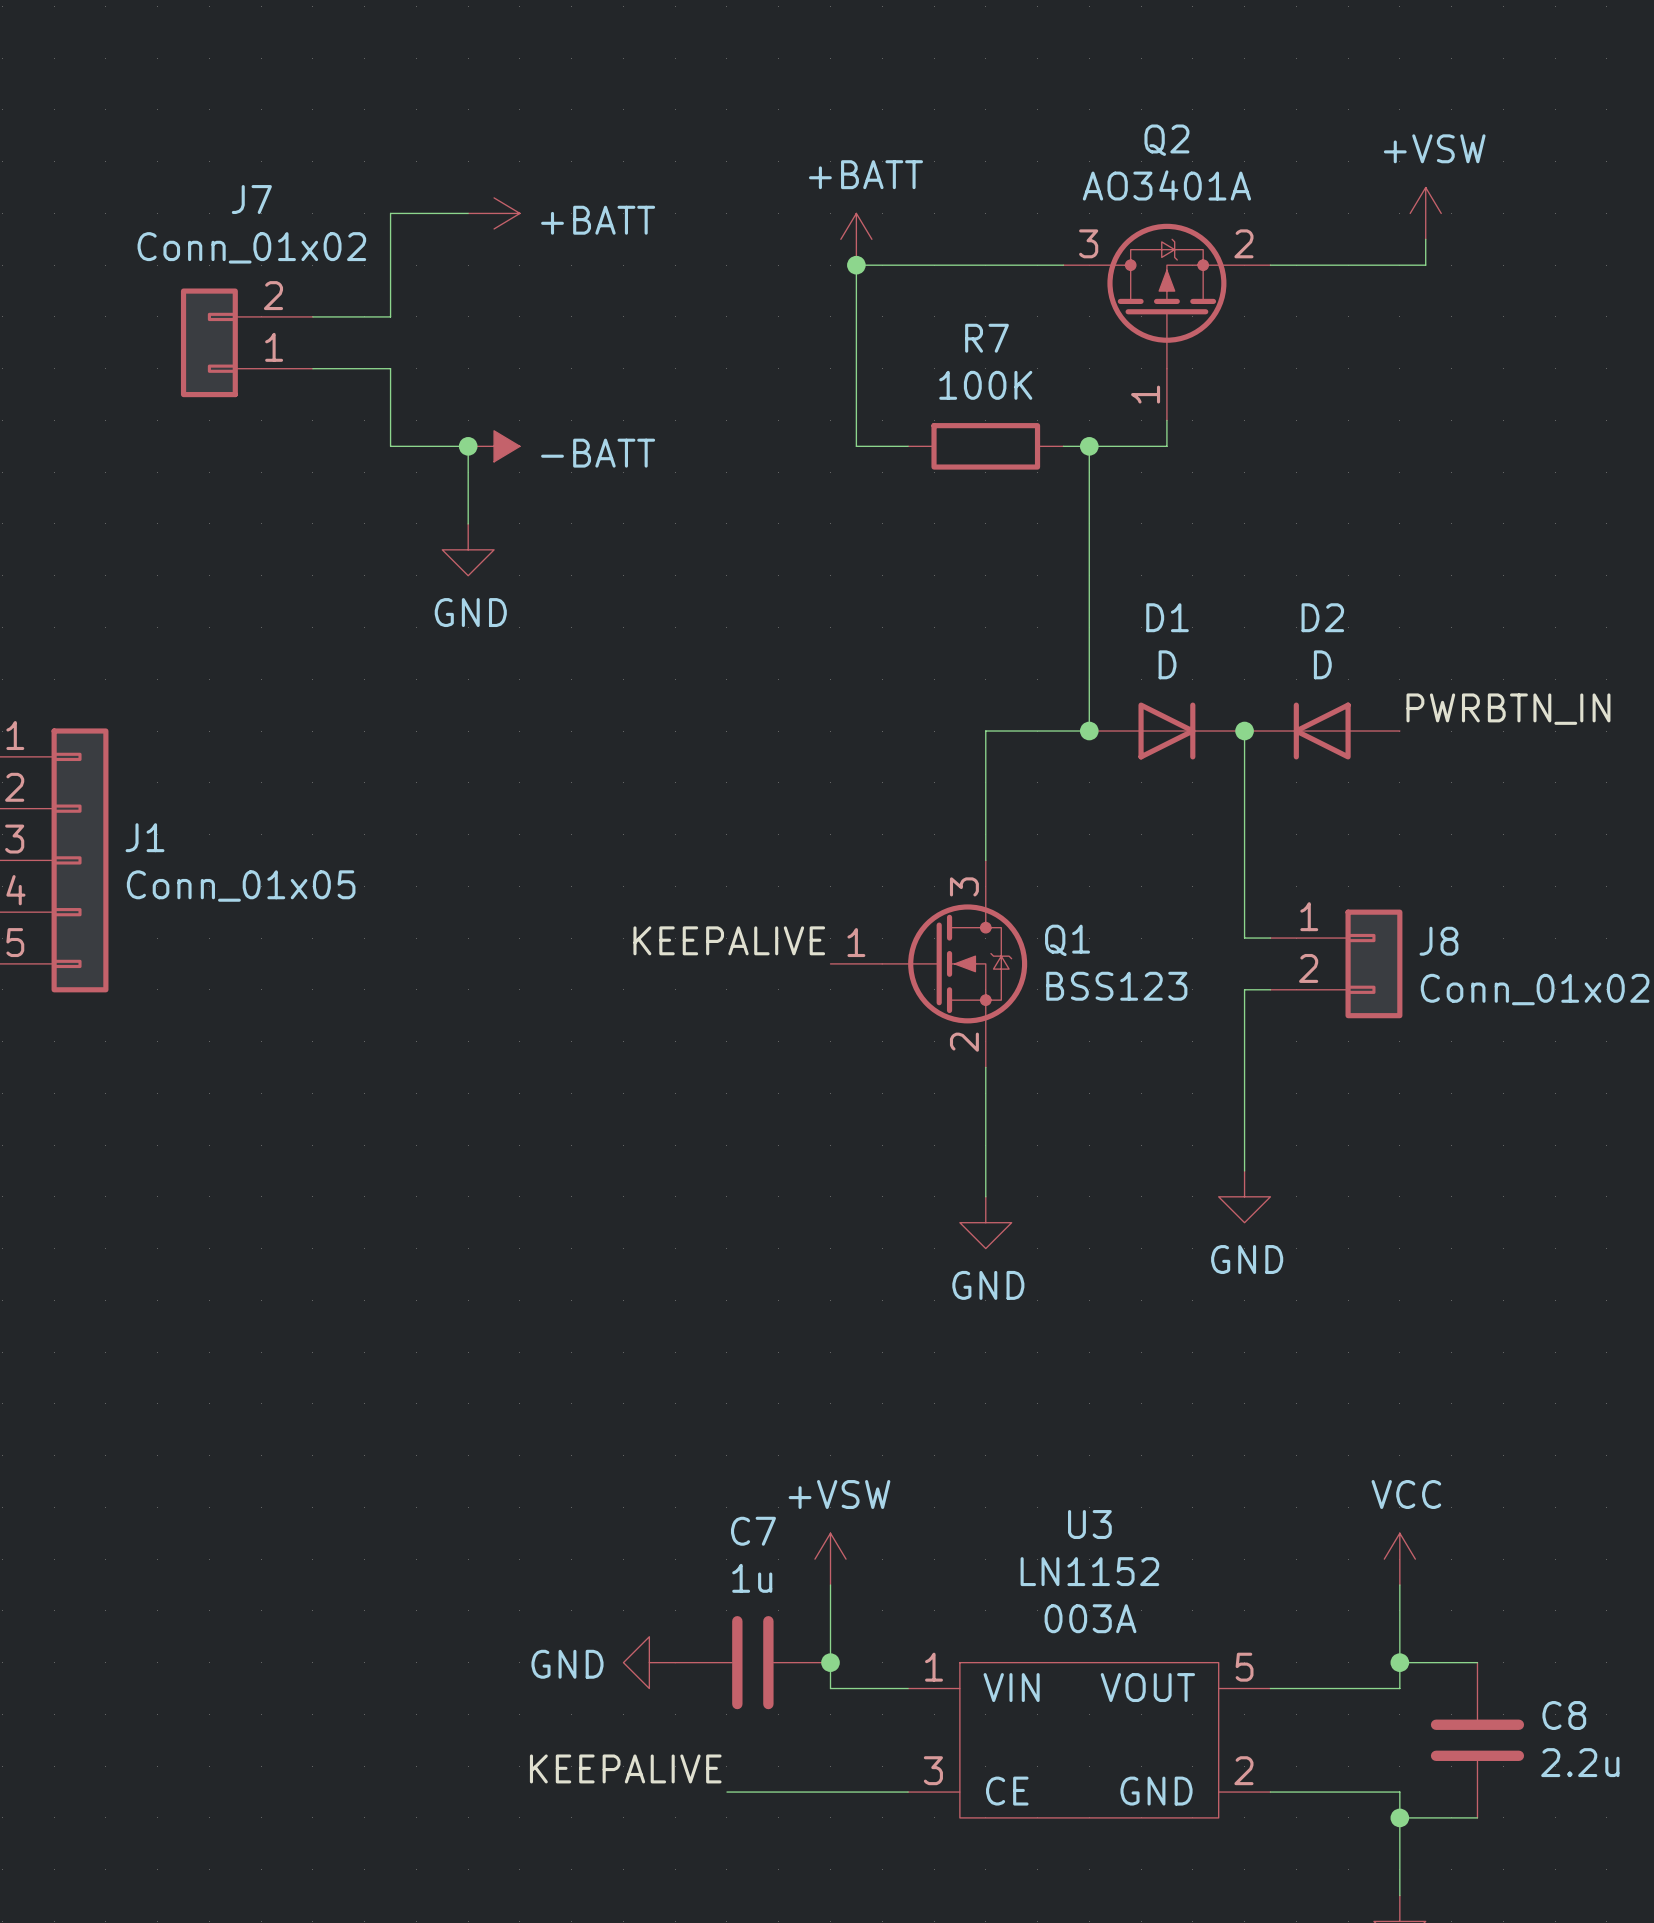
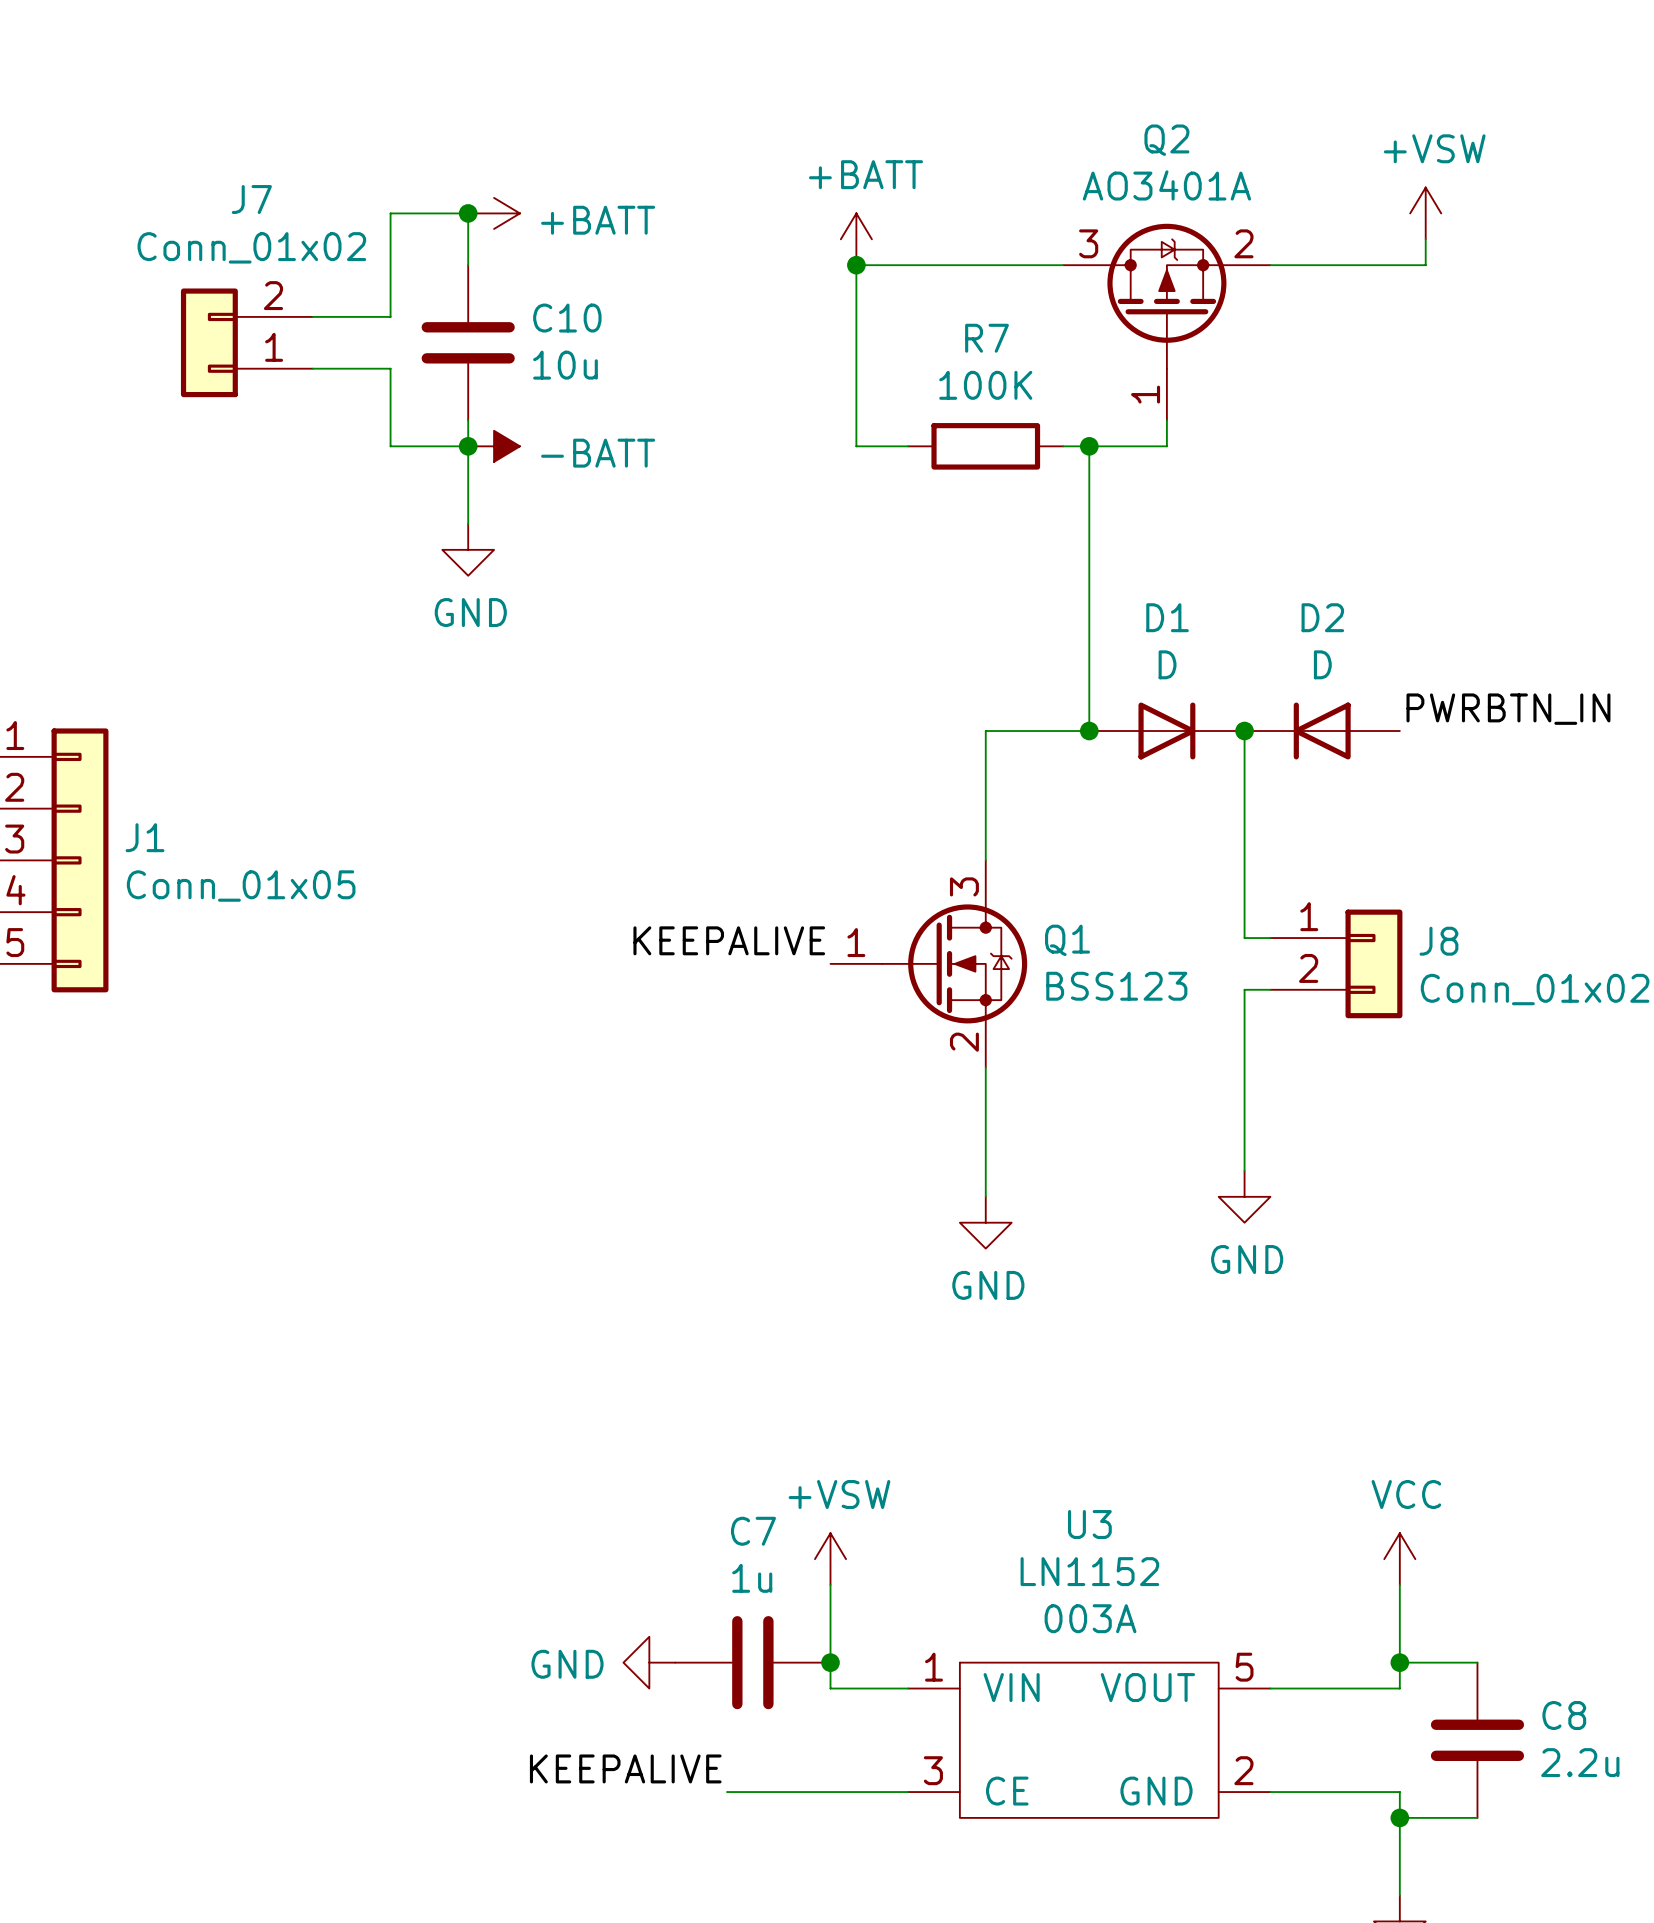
wire: none -> (468, 213) (468, 265)
junction: none -> (468, 213)
C10: none -> 10u (468, 342)
wire: none -> (468, 420) (468, 446)

